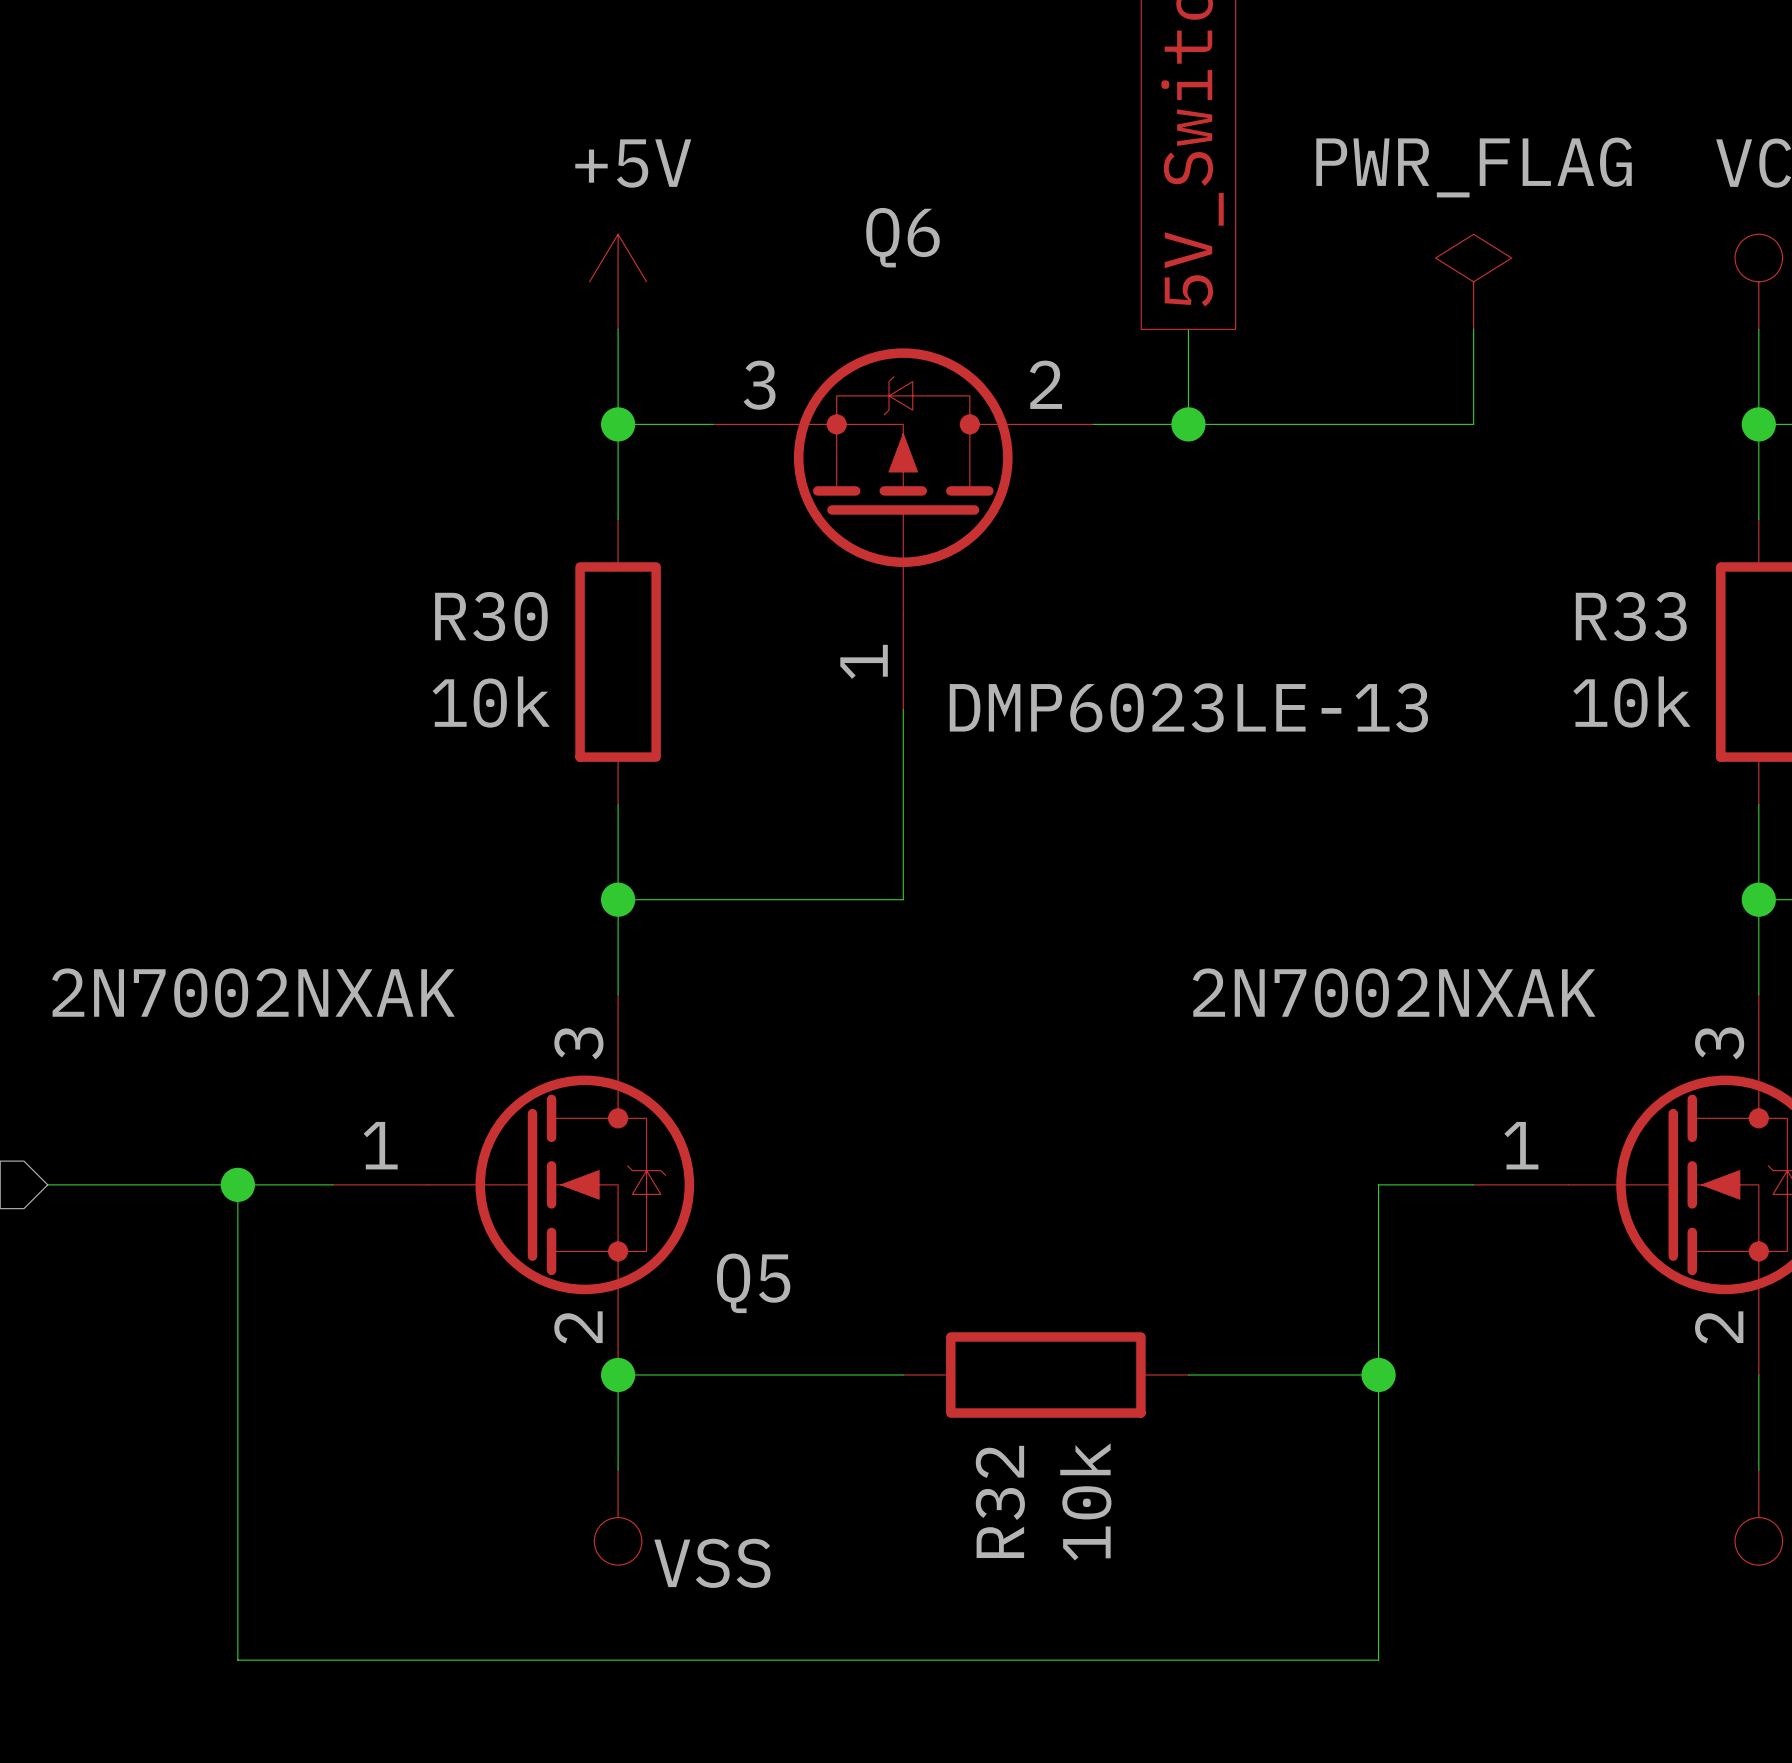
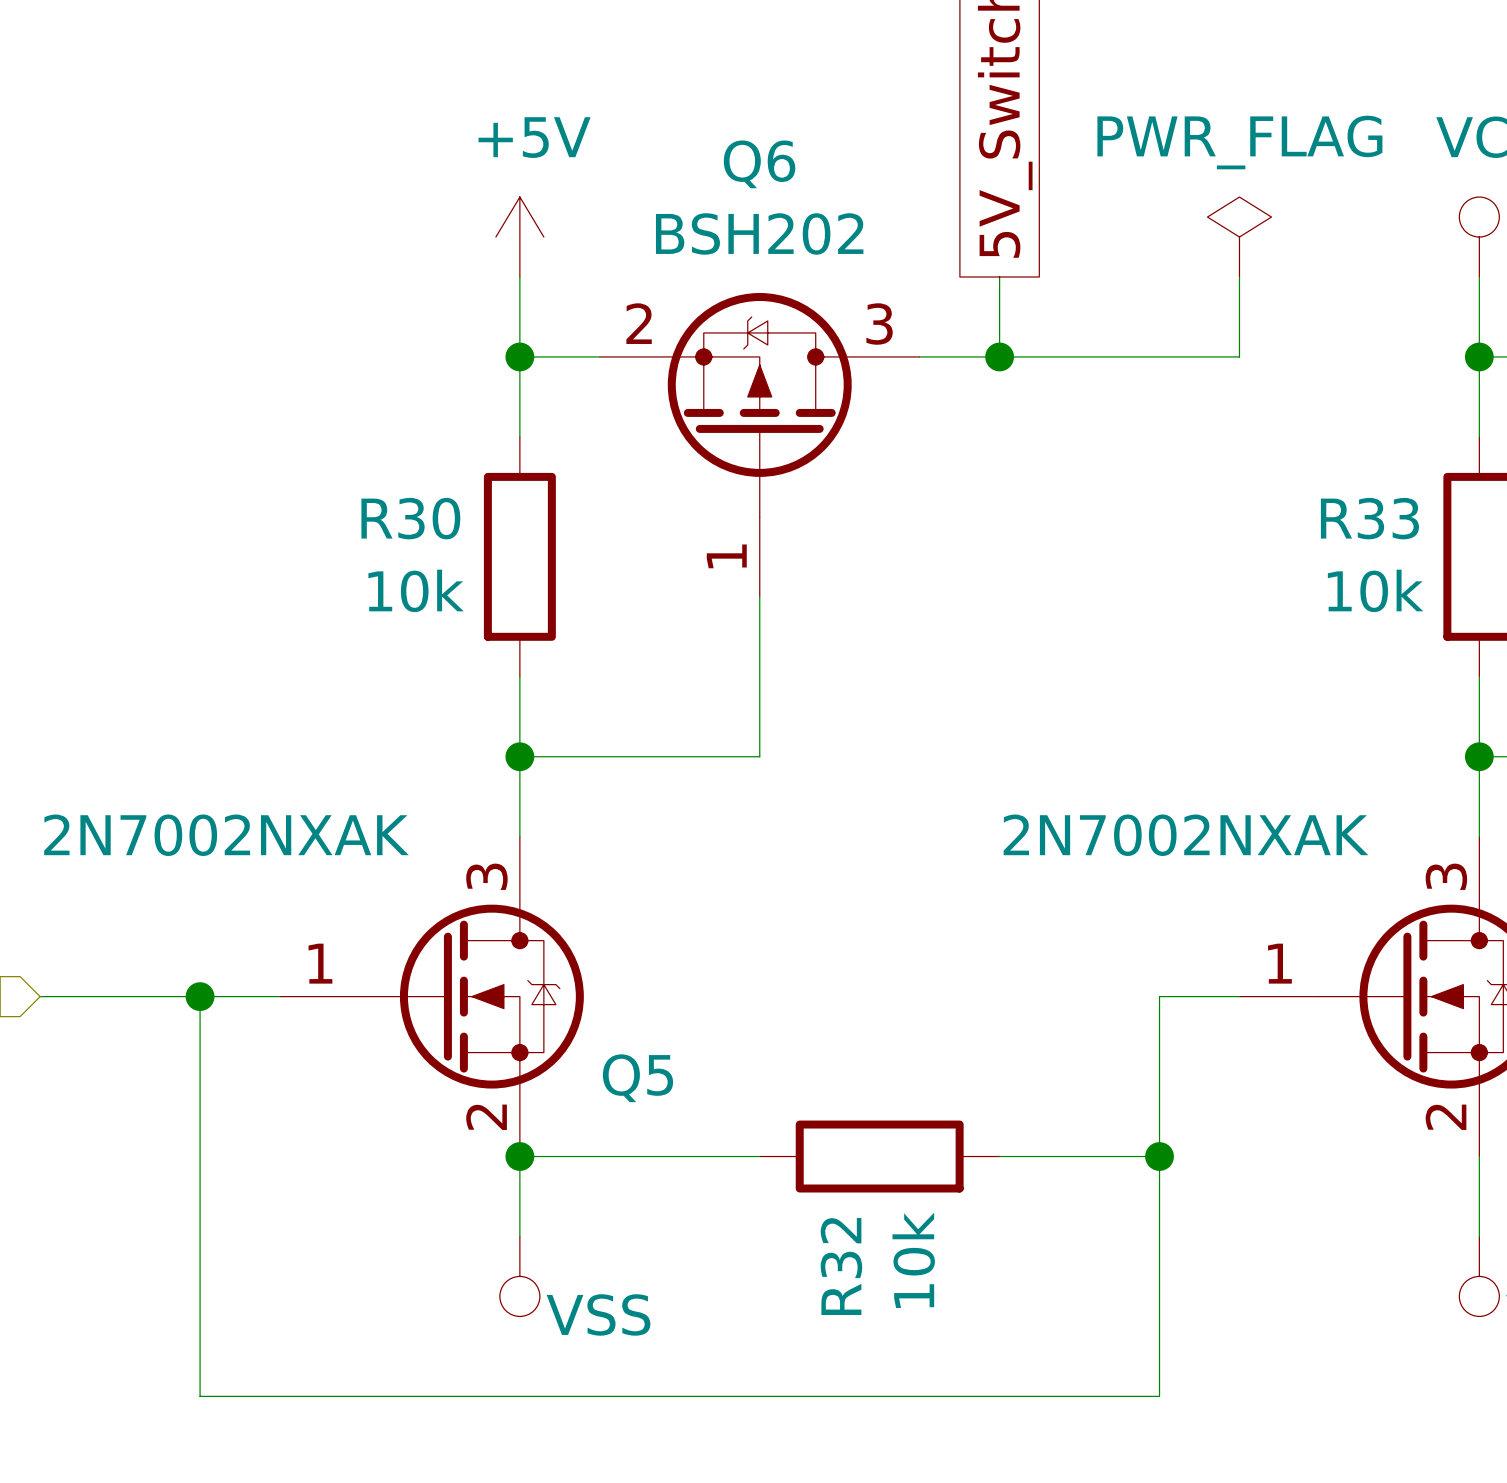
Q6 name position: Q6 (902, 237) -> Q6 (759, 164)
Q6 pin number: 2 (1045, 384) -> 3 (879, 324)
Q6 pin number: 3 (759, 385) -> 2 (639, 323)
Q6 value: DMP6023LE-13 (1188, 707) -> BSH202 (759, 233)

